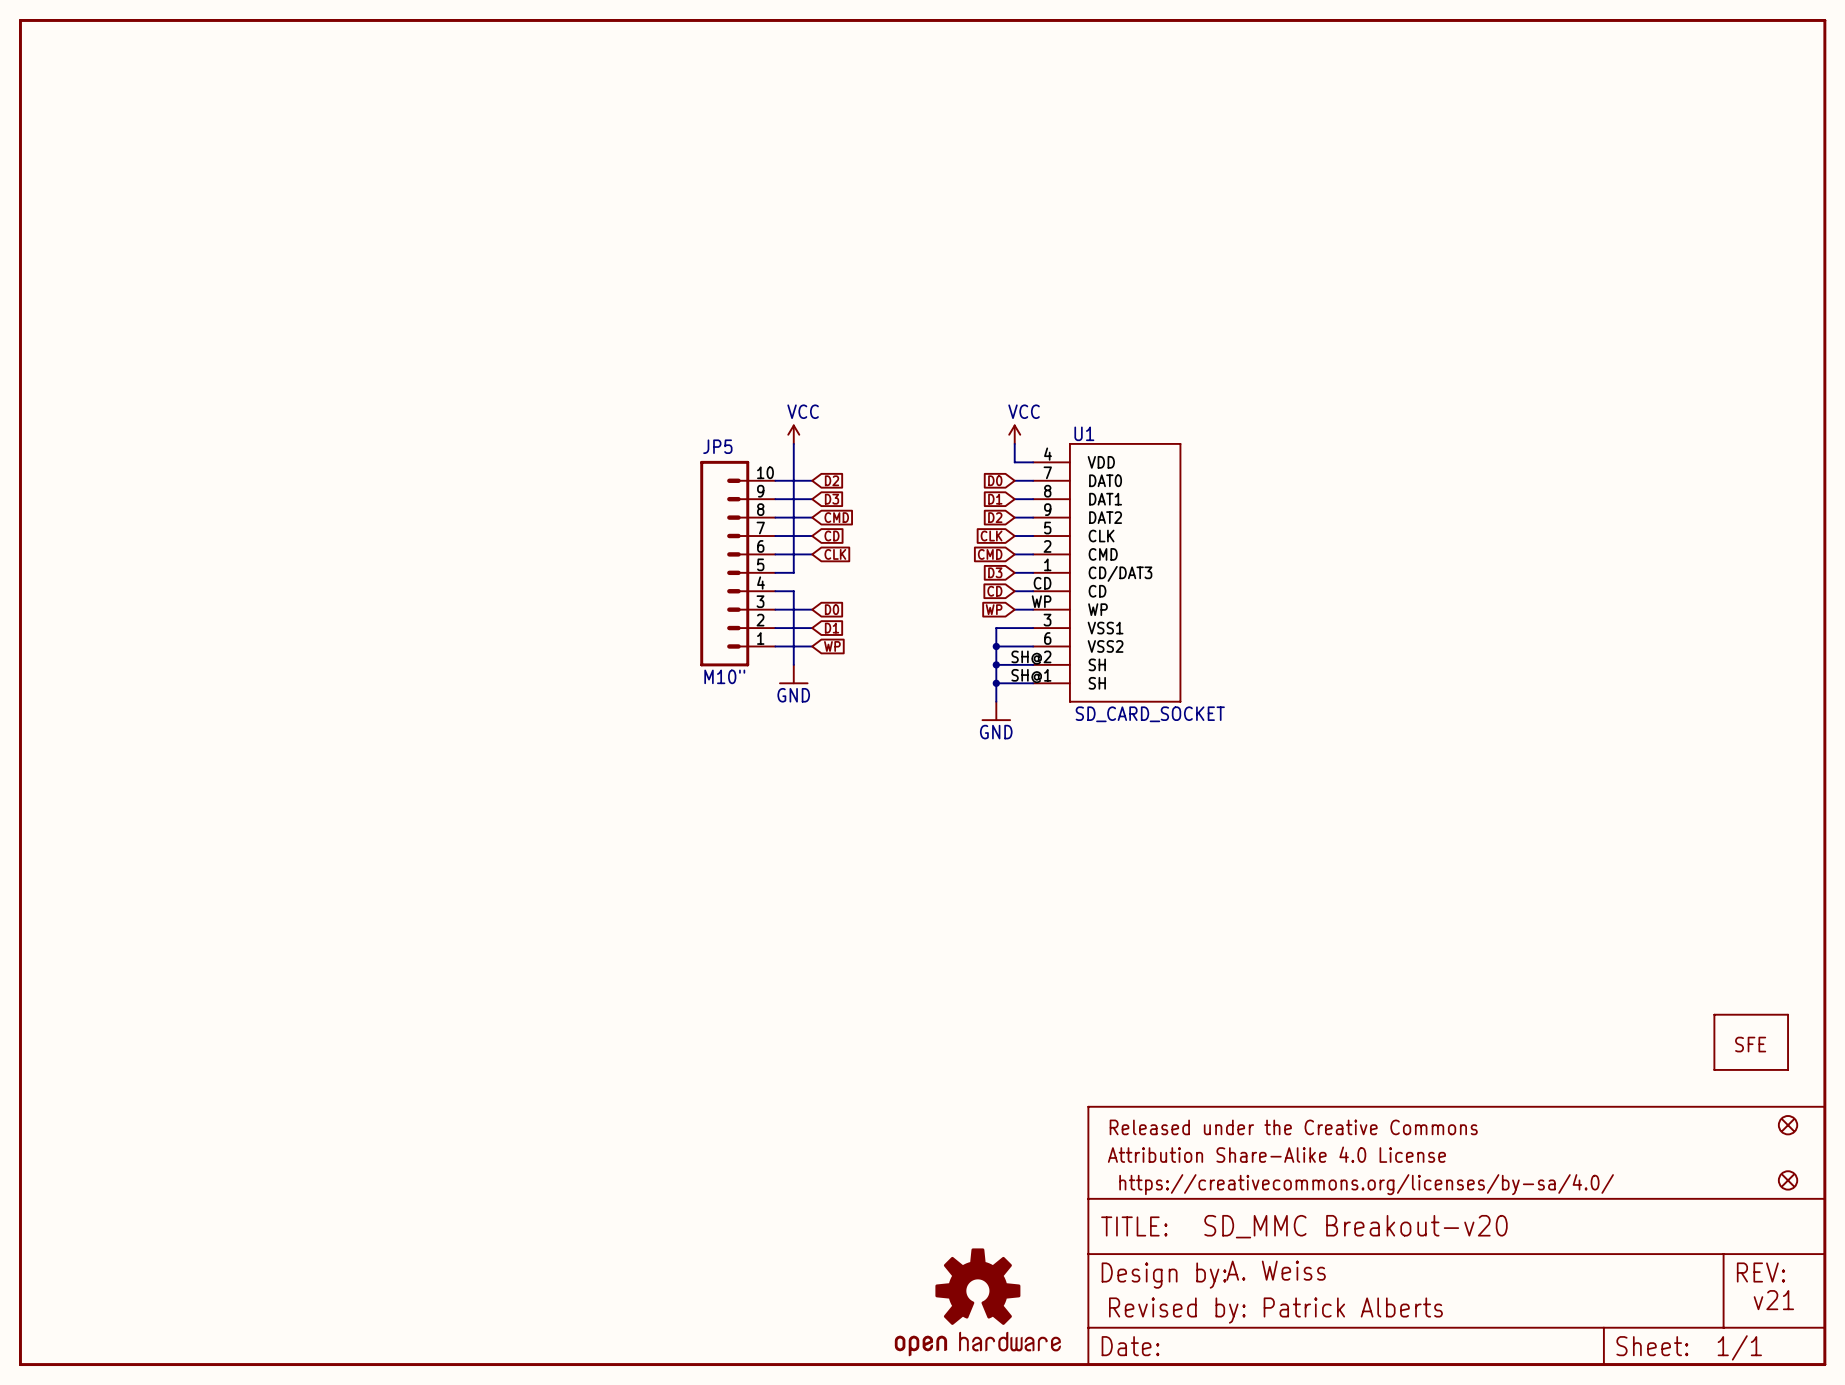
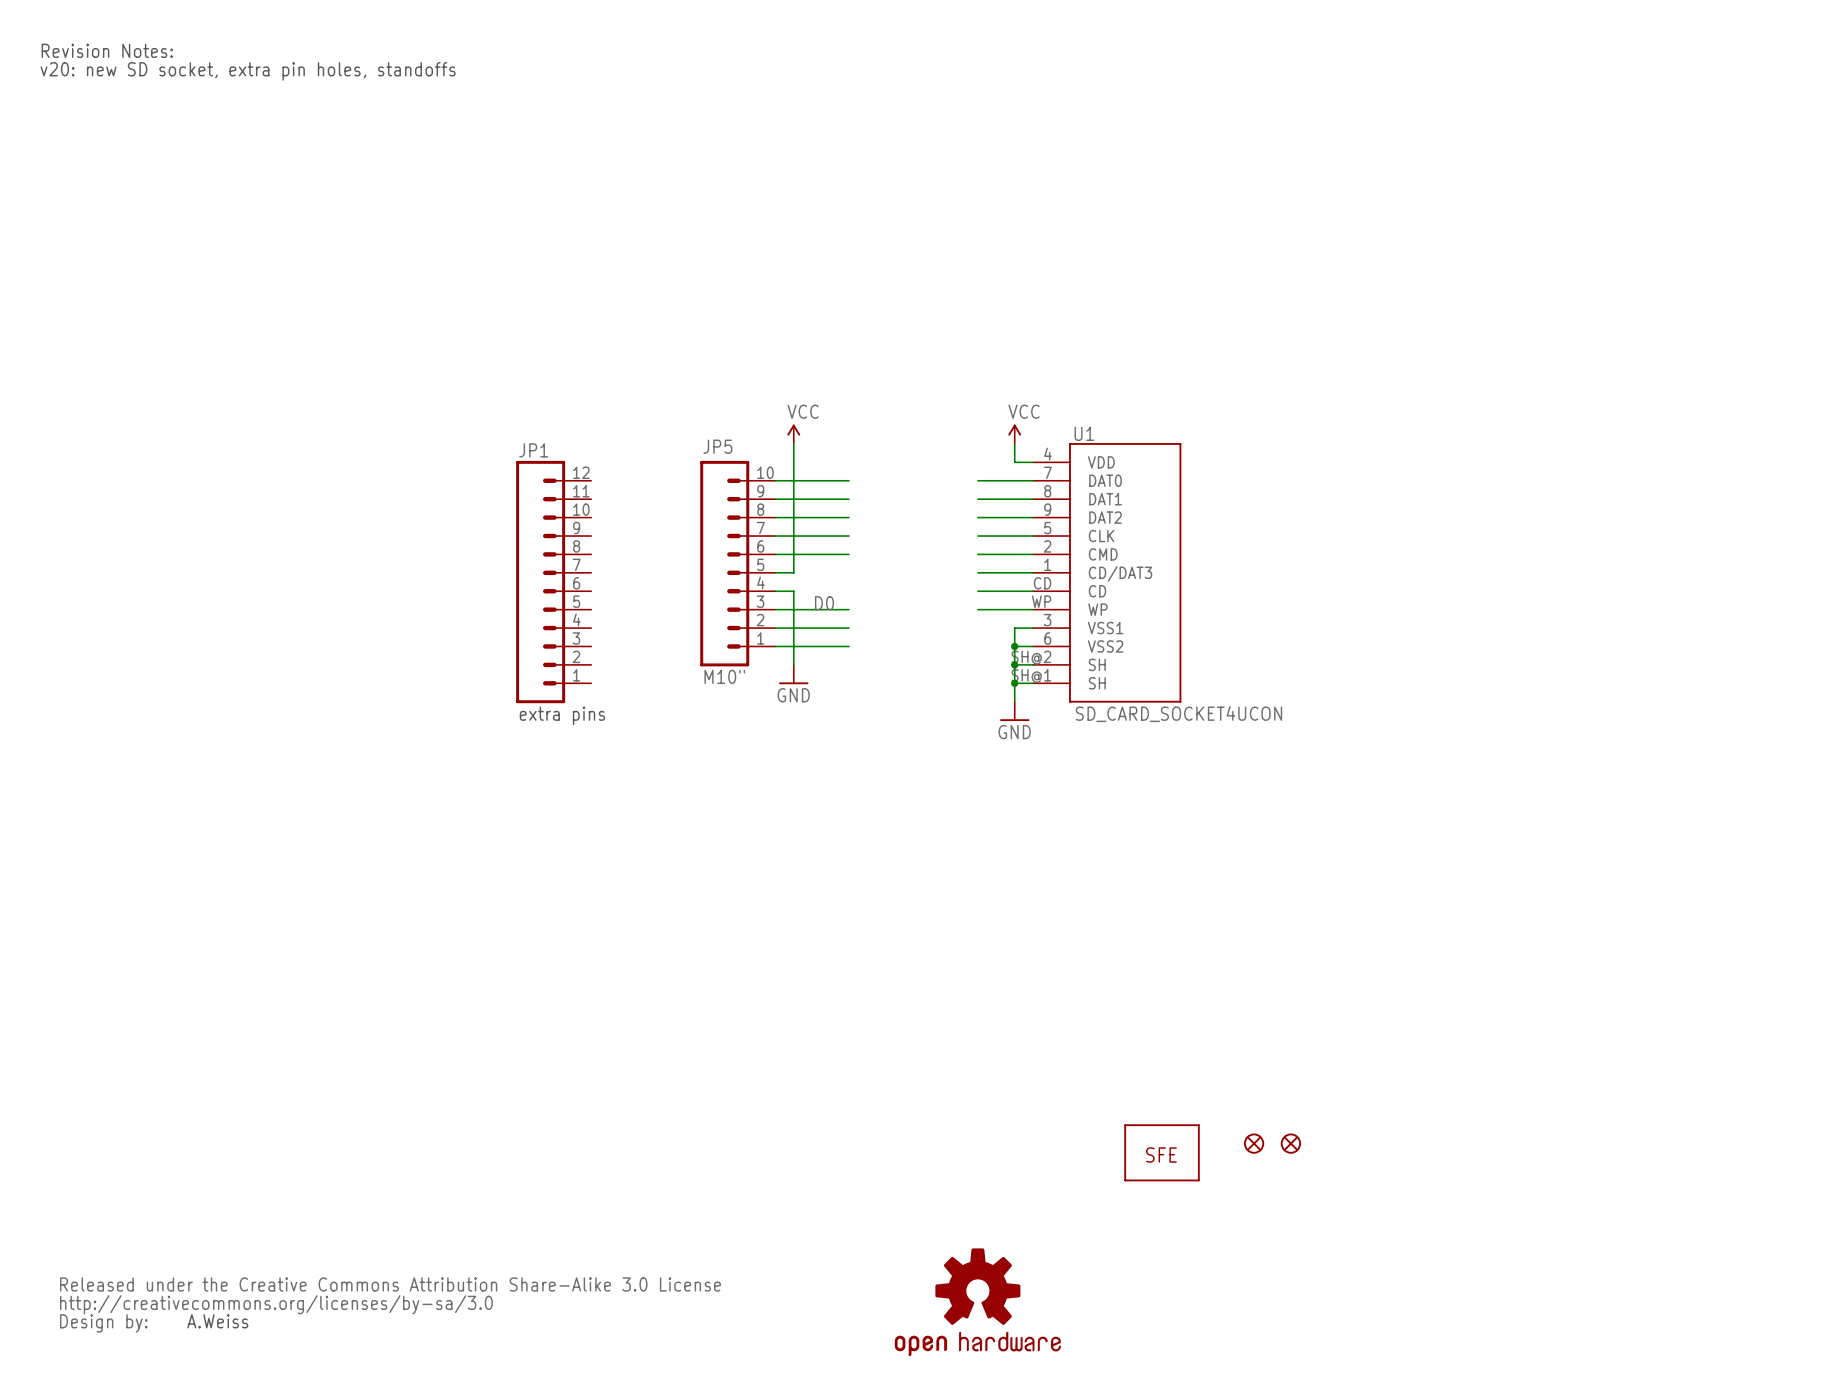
text: none -> Revision Notes: (107, 50)
text: none -> v20: new SD socket, extra pin holes, standoffs (248, 71)
wire: none -> (812, 480) (849, 480)
global label: D2 (832, 480) -> none
wire: none -> (977, 480) (1014, 480)
global label: D0 (995, 480) -> none
wire: none -> (812, 499) (849, 499)
global label: D3 (832, 499) -> none
wire: none -> (977, 499) (1014, 499)
global label: D1 (995, 499) -> none
wire: none -> (812, 517) (849, 517)
global label: CMD (836, 517) -> none
wire: none -> (977, 517) (1014, 517)
global label: D2 (995, 517) -> none
wire: none -> (812, 536) (849, 536)
global label: CD (832, 536) -> none
wire: none -> (977, 536) (1014, 536)
global label: CLK (991, 536) -> none
wire: none -> (812, 554) (849, 554)
global label: CLK (835, 554) -> none
wire: none -> (977, 554) (1014, 554)
global label: CMD (990, 554) -> none
wire: none -> (977, 572) (1014, 572)
global label: D3 (995, 572) -> none
JP1: none -> (553, 582)
wire: none -> (977, 591) (1014, 591)
global label: CD (994, 591) -> none
label: none -> D0 (824, 603)
wire: none -> (812, 609) (849, 609)
global label: D0 (832, 609) -> none
wire: none -> (977, 609) (1014, 609)
global label: WP (994, 609) -> none
wire: none -> (812, 628) (849, 628)
global label: D1 (832, 628) -> none
wire: (1014, 628) (996, 628) (996, 701) -> (1014, 628) (1014, 701)
wire: none -> (812, 646) (849, 646)
global label: WP (832, 646) -> none
wire: (996, 646) (1014, 646) -> none
junction: (996, 646) -> none
junction: none -> (1014, 646)
wire: (996, 664) (1014, 664) -> none
junction: (996, 664) -> none
junction: none -> (1014, 664)
wire: (996, 683) (1014, 683) -> none
junction: (996, 683) -> none
junction: none -> (1014, 683)
part: (922, 692) -> none
power symbol position: GND (996, 711) -> GND (1014, 711)
U1 value: SD_CARD_SOCKET (1150, 714) -> SD_CARD_SOCKET4UCON (1178, 713)
text: none -> extra pins (562, 715)
part: (1751, 1042) -> none
part: (1788, 1125) -> none
part: none -> (1254, 1143)
part: none -> (1290, 1143)
part: none -> (1162, 1152)
part: (1788, 1180) -> none
part: (1456, 1235) -> none
text: A. Weiss (1276, 1270) -> none
text: v21 (1773, 1300) -> none
part: none -> (390, 1305)
text: Revised by: Patrick Alberts (1275, 1310) -> none
text: none -> A.Weiss (217, 1321)

